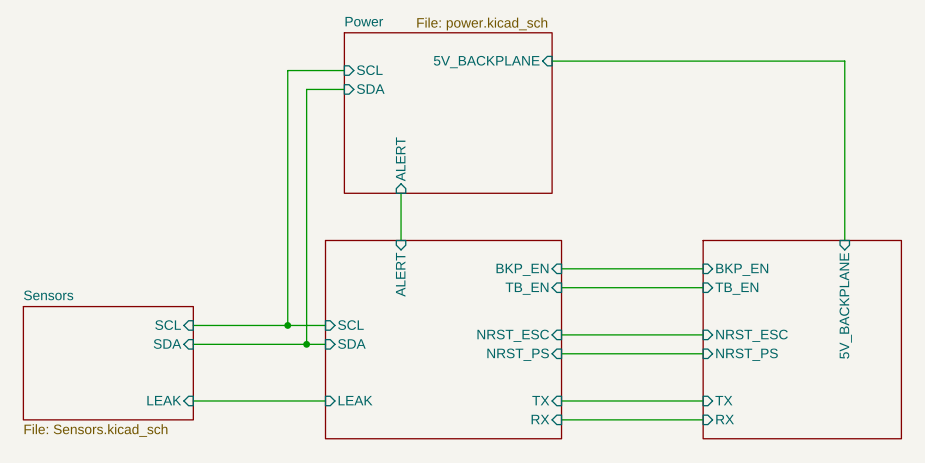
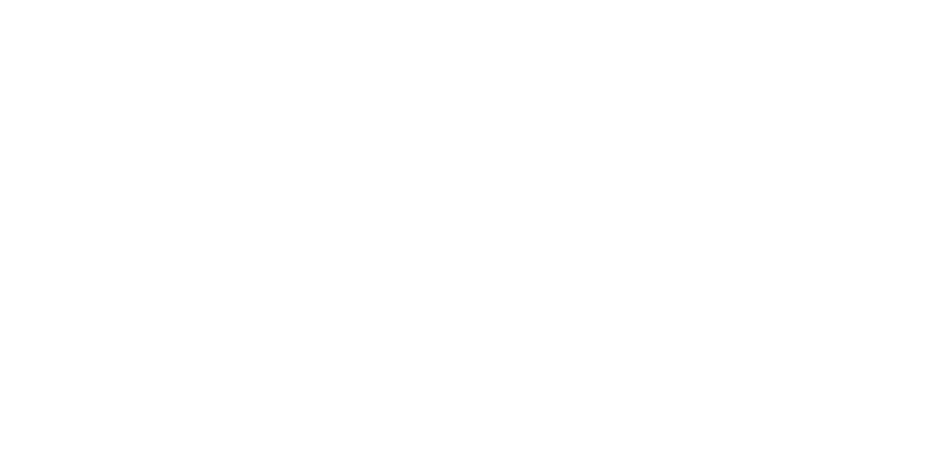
wire: (552, 61) (844, 61) (844, 240) -> none
sheet pin: 5V_BACKPLANE (486, 62) -> none
wire: (344, 70) (287, 70) (287, 325) -> none
sheet pin: SCL (369, 70) -> none
wire: (344, 89) (306, 89) (306, 344) -> none
sheet pin: SDA (370, 89) -> none
sheet Power: File: power.kicad_sch (448, 113) -> none
sheet pin: ALERT (400, 159) -> none
wire: (401, 193) (401, 240) -> none
wire: (561, 268) (703, 268) -> none
sheet pin: BKP_EN (522, 269) -> none
sheet pin: BKP_EN (742, 269) -> none
sheet pin: ALERT (400, 274) -> none
wire: (561, 287) (703, 287) -> none
sheet pin: TB_EN (527, 288) -> none
sheet pin: TB_EN (736, 288) -> none
sheet pin: 5V_BACKPLANE (845, 305) -> none
sheet pin: SCL (168, 325) -> none
wire: (193, 325) (325, 325) -> none
junction: (287, 325) -> none
sheet pin: SCL (350, 325) -> none
wire: (561, 334) (703, 334) -> none
sheet pin: NRST_ESC (513, 335) -> none
sheet pin: NRST_ESC (752, 335) -> none
sheet: (443, 339) -> none
sheet: (802, 339) -> none
sheet pin: SDA (167, 343) -> none
sheet pin: SDA (351, 343) -> none
wire: (193, 344) (325, 344) -> none
junction: (306, 344) -> none
wire: (561, 353) (703, 353) -> none
sheet pin: NRST_PS (518, 354) -> none
sheet pin: NRST_PS (747, 354) -> none
sheet Sensors: File: Sensors.kicad_sch (108, 363) -> none
sheet pin: LEAK (164, 400) -> none
wire: (193, 400) (325, 400) -> none
sheet pin: LEAK (355, 400) -> none
sheet pin: TX (540, 400) -> none
wire: (561, 400) (703, 400) -> none
sheet pin: TX (723, 400) -> none
sheet pin: RX (540, 419) -> none
wire: (561, 419) (703, 419) -> none
sheet pin: RX (725, 419) -> none

